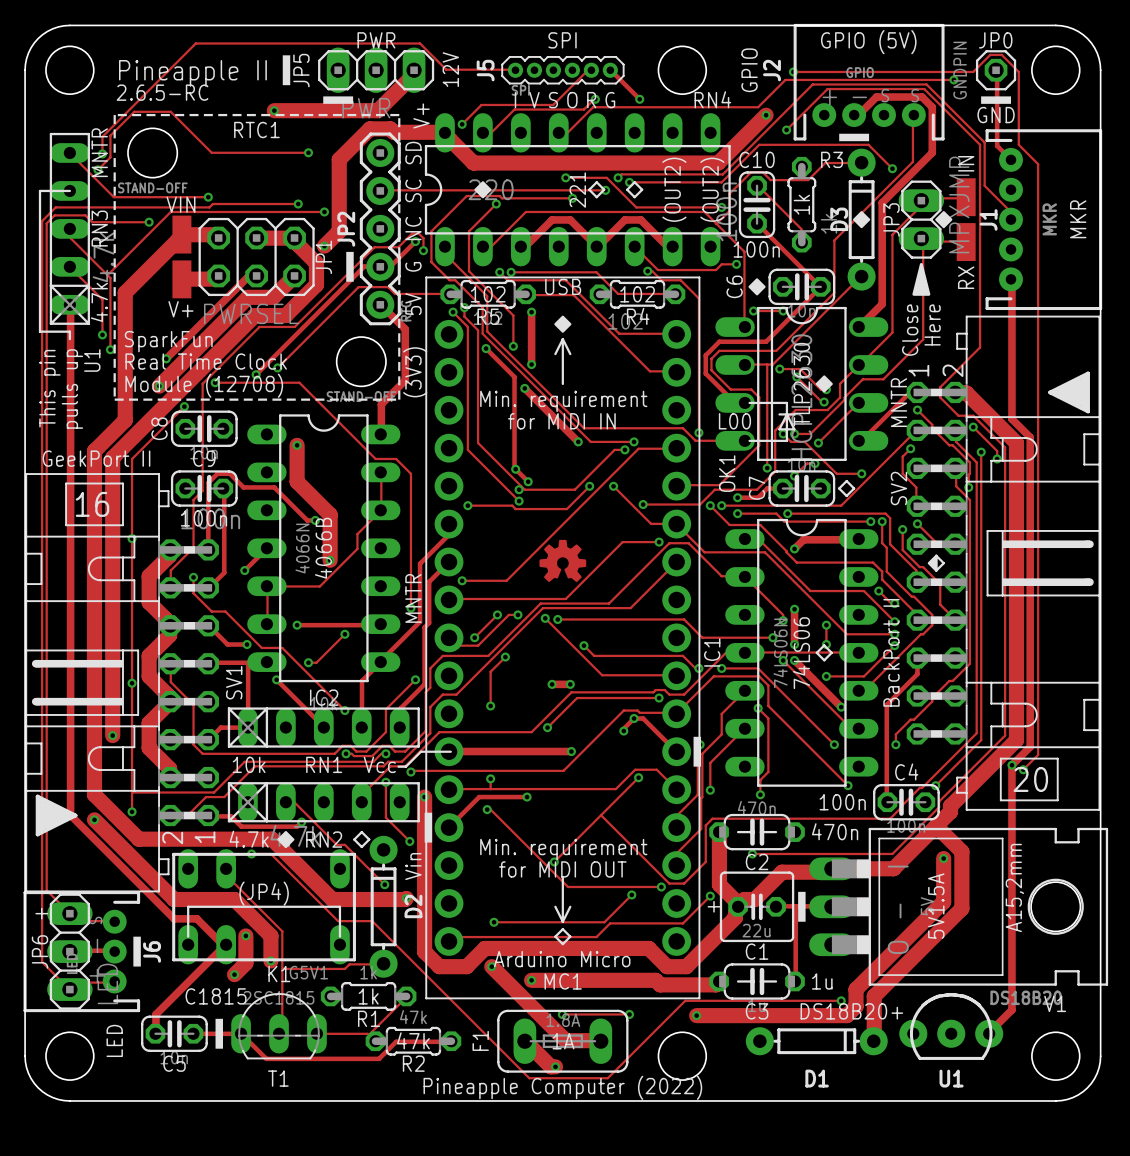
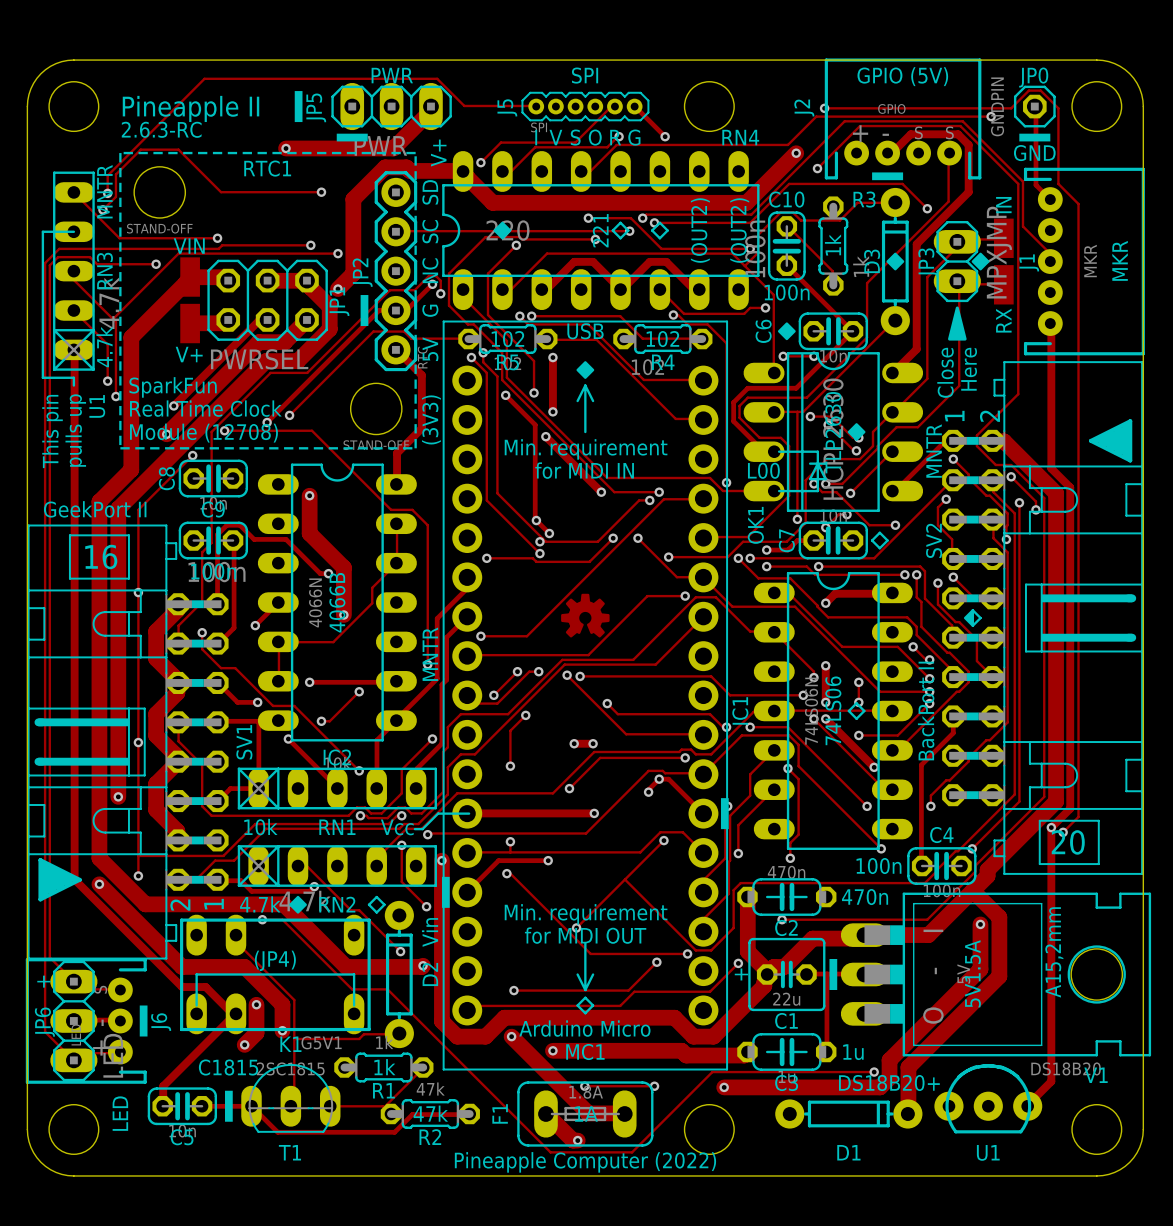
text: 12V (450, 69) -> none
text: GPIO (749, 70) -> none
text: 2.6.5-RC (162, 92) -> 2.6.3-RC (161, 129)

